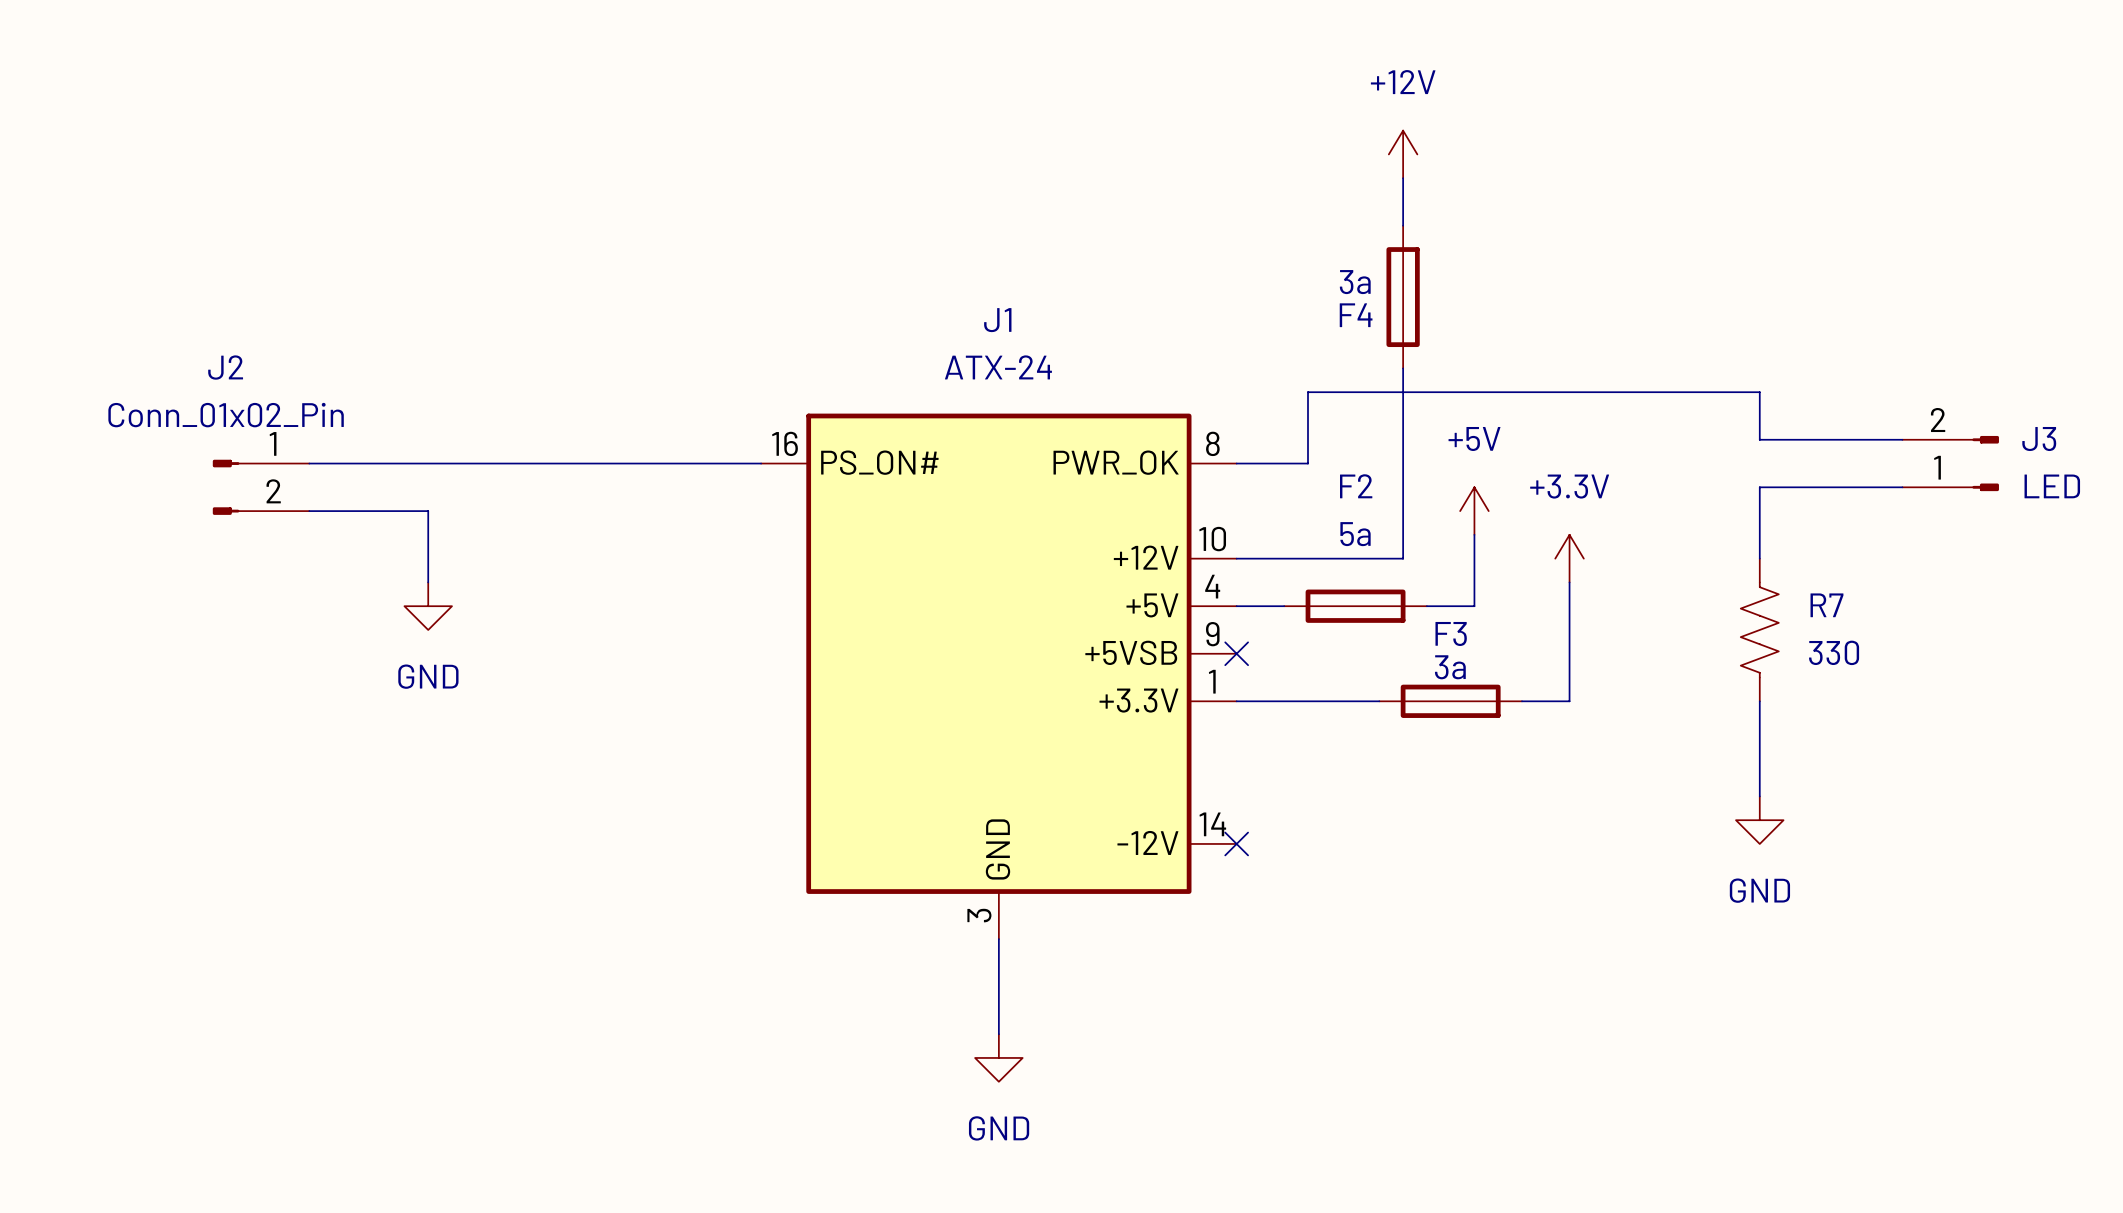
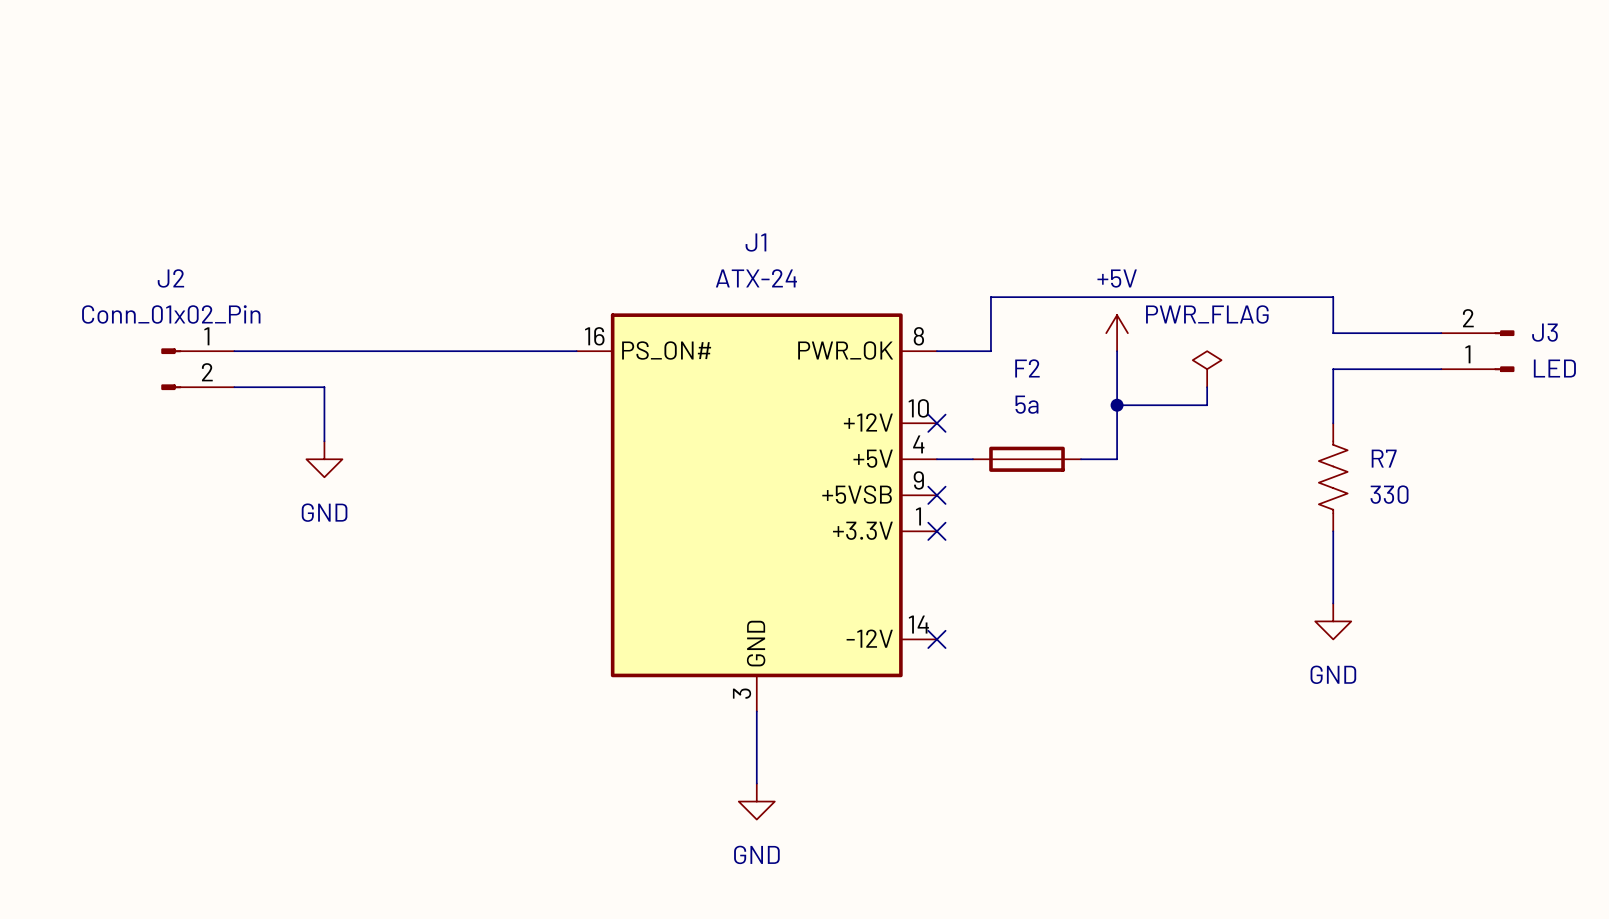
power symbol: +12V (1403, 154) -> none
wire: (1403, 178) (1403, 225) -> none
F4: 3a (1403, 297) -> none
wire: (1403, 368) (1403, 558) (1236, 558) -> none
wire: none -> (1117, 351) (1117, 405) (1207, 405) (1207, 387)
power symbol: none -> PWR_FLAG (1207, 369)
power symbol position: +5V (1474, 511) -> +5V (1117, 333)
junction: none -> (1117, 405)
no-connect mark: none -> (936, 423)
power symbol: +3.3V (1569, 558) -> none
wire: (1569, 582) (1569, 701) (1521, 701) -> none
wire: (1236, 701) (1379, 701) -> none
no-connect mark: none -> (936, 531)
F3: 3a (1450, 701) -> none

